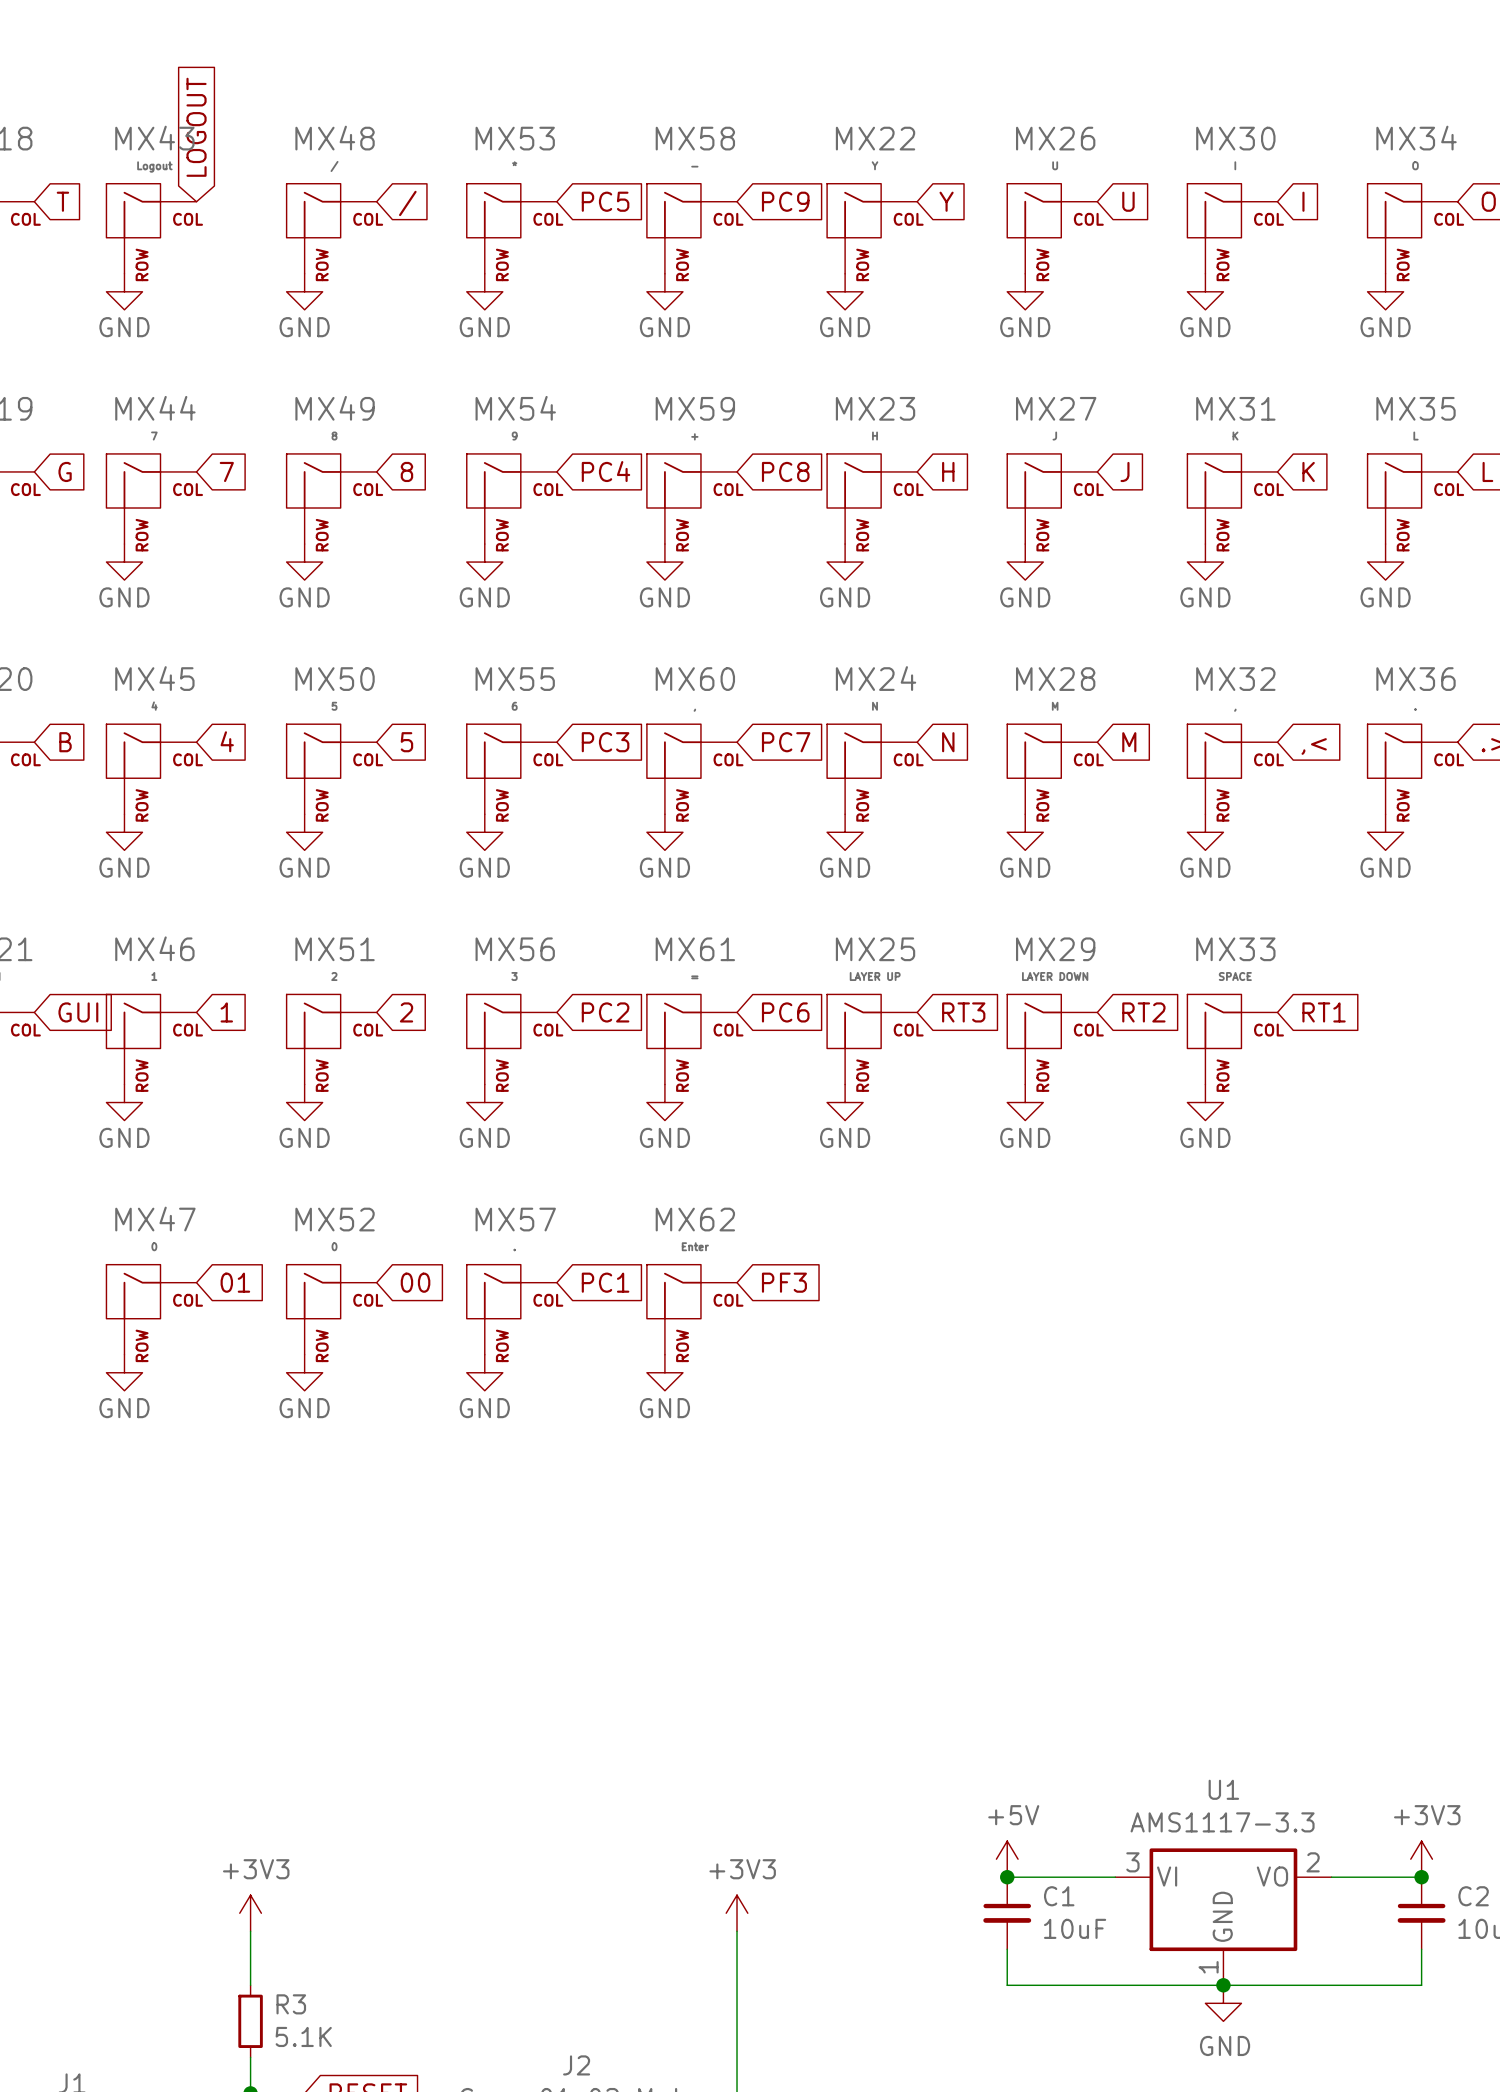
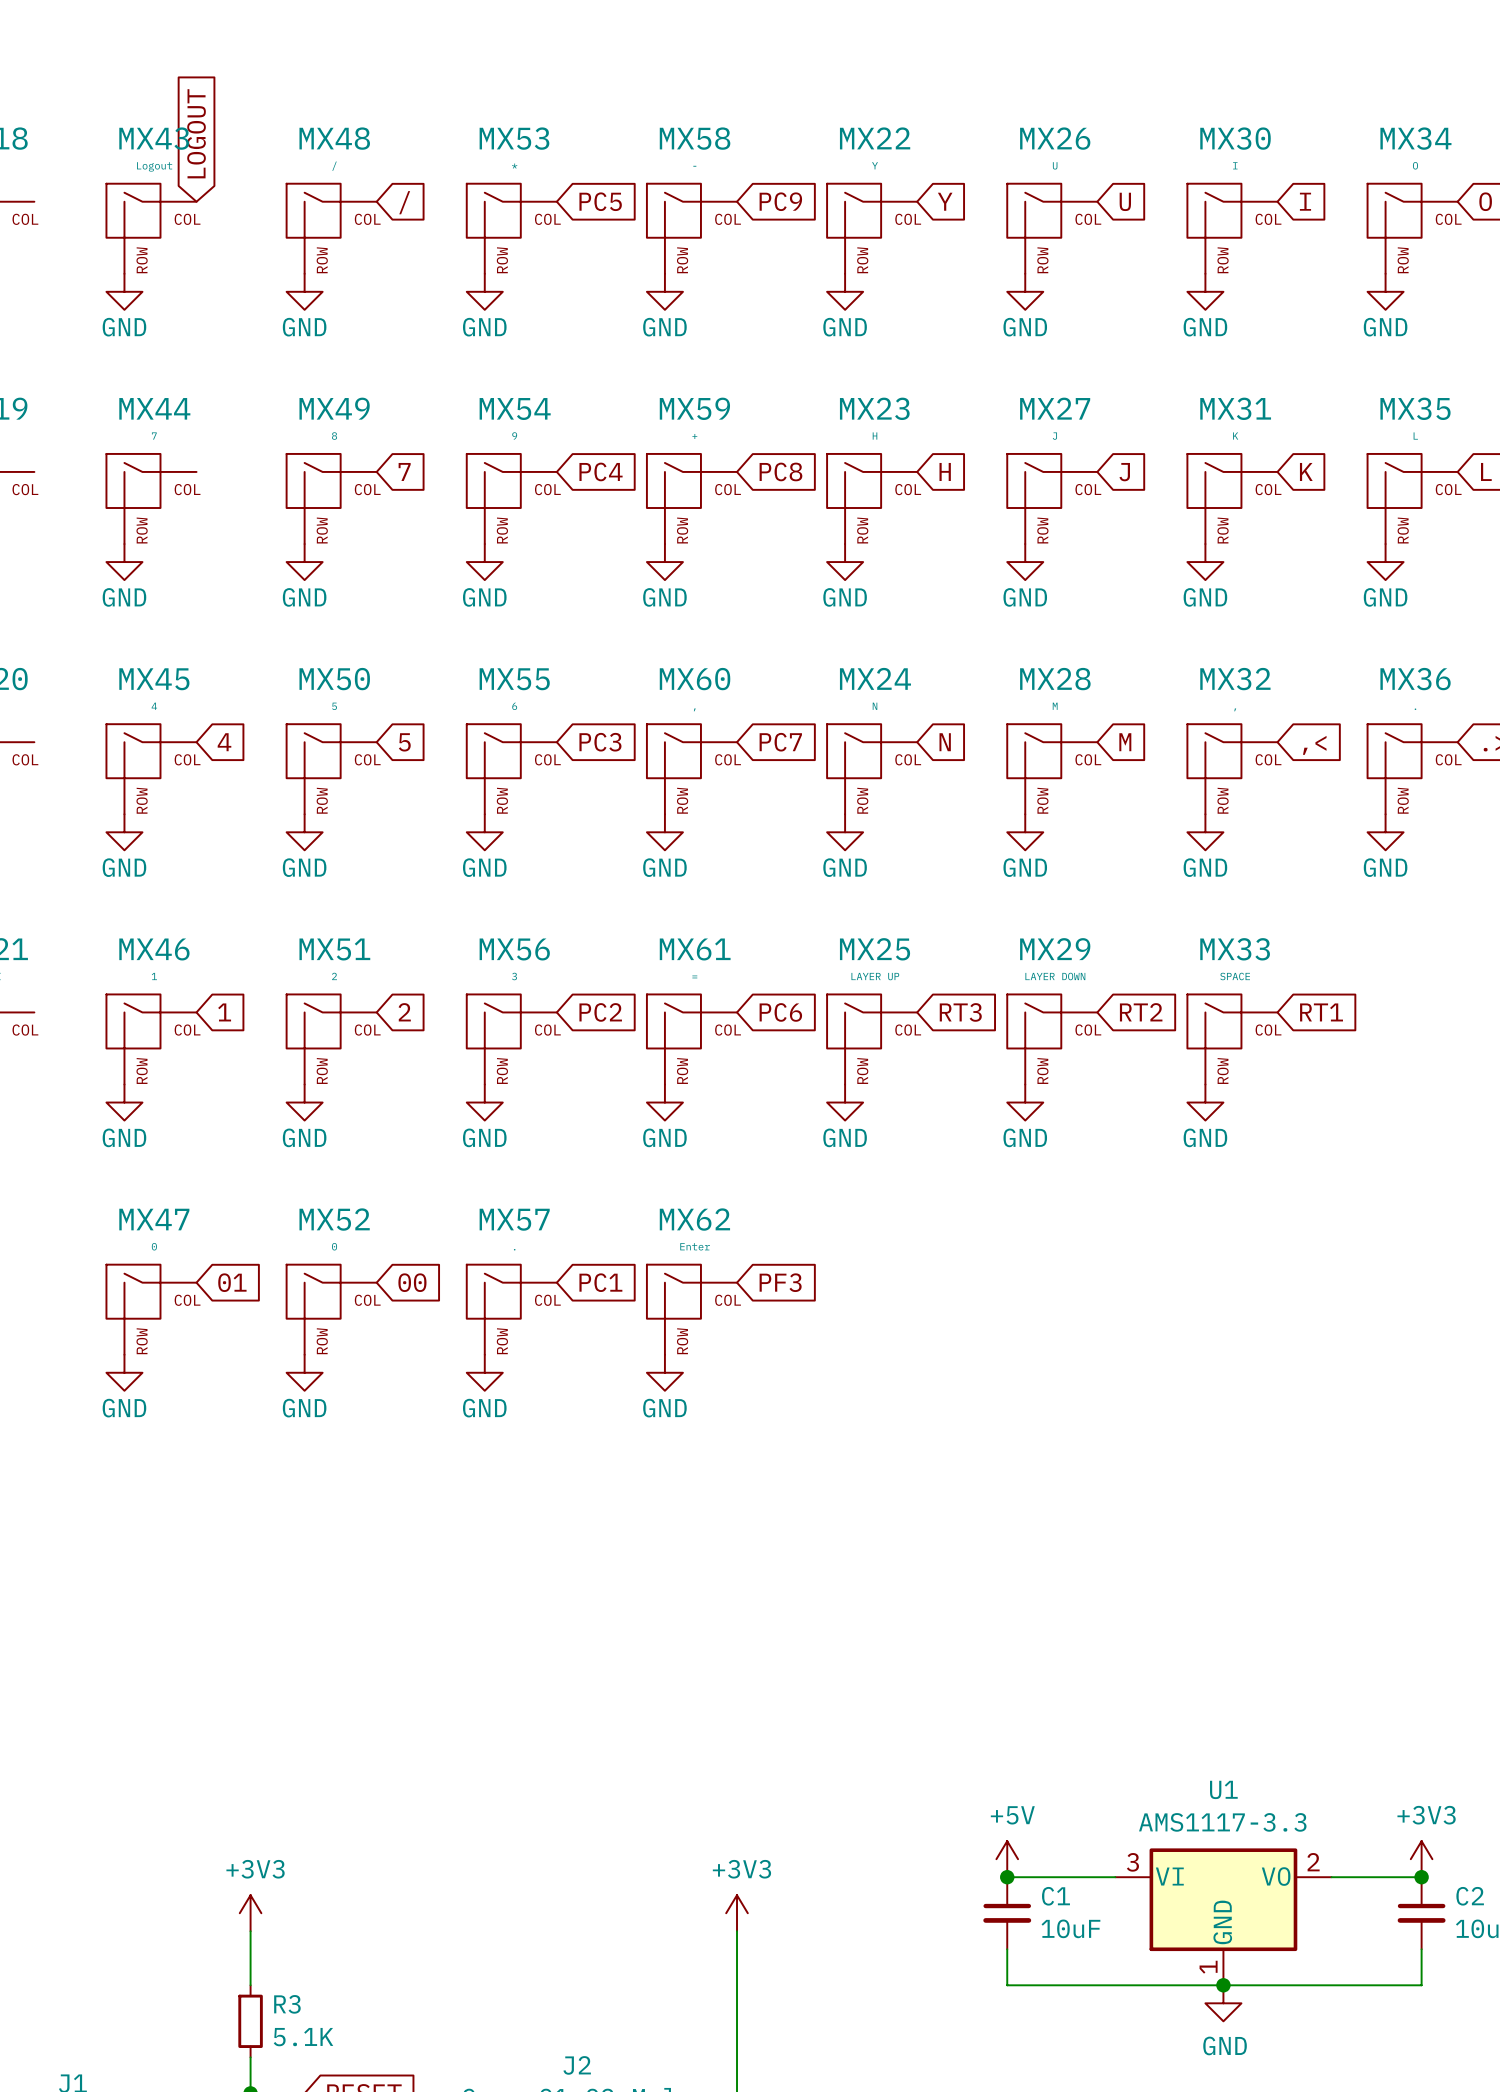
global label: T (62, 201) -> none
global label: G (65, 471) -> none
global label: 7 (226, 471) -> none
global label: 8 (406, 471) -> 7 (404, 471)
global label: B (65, 742) -> none
global label: GUI (78, 1012) -> none

